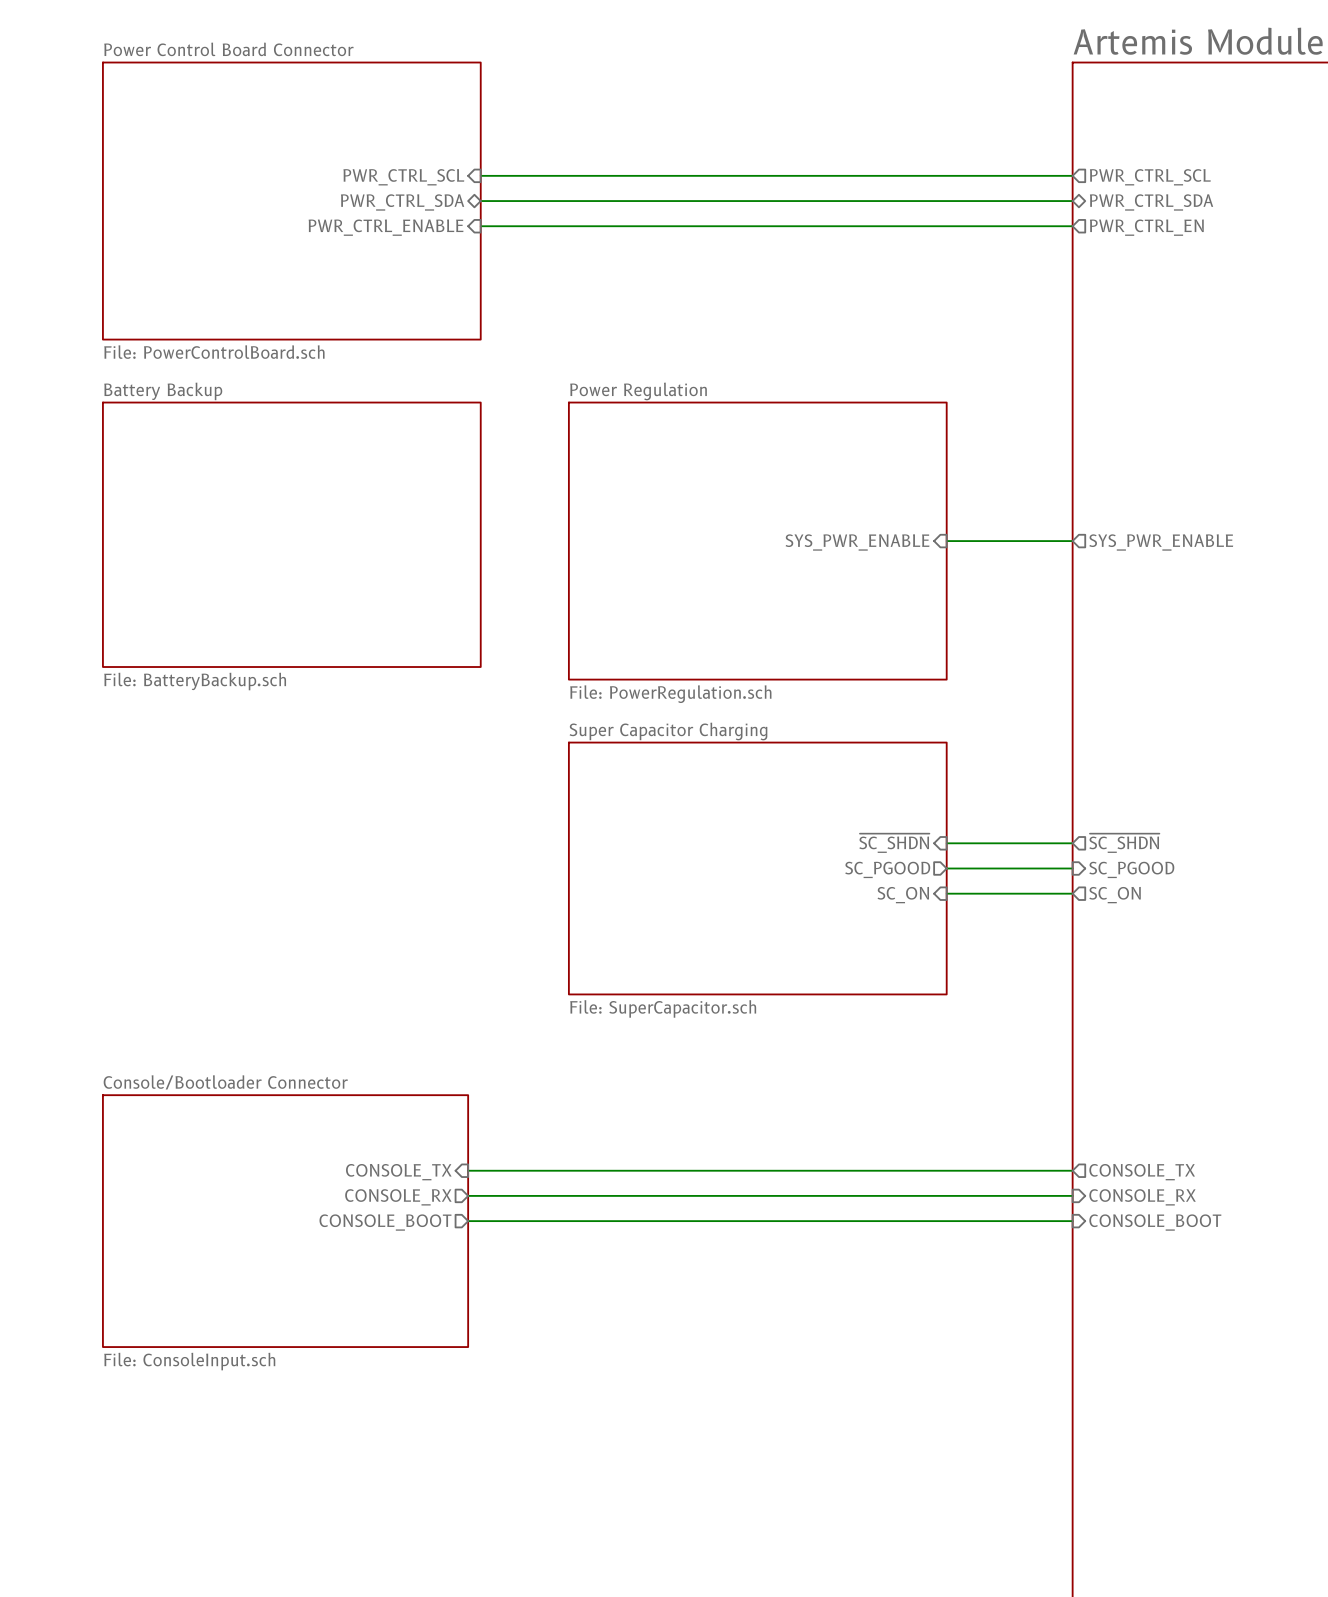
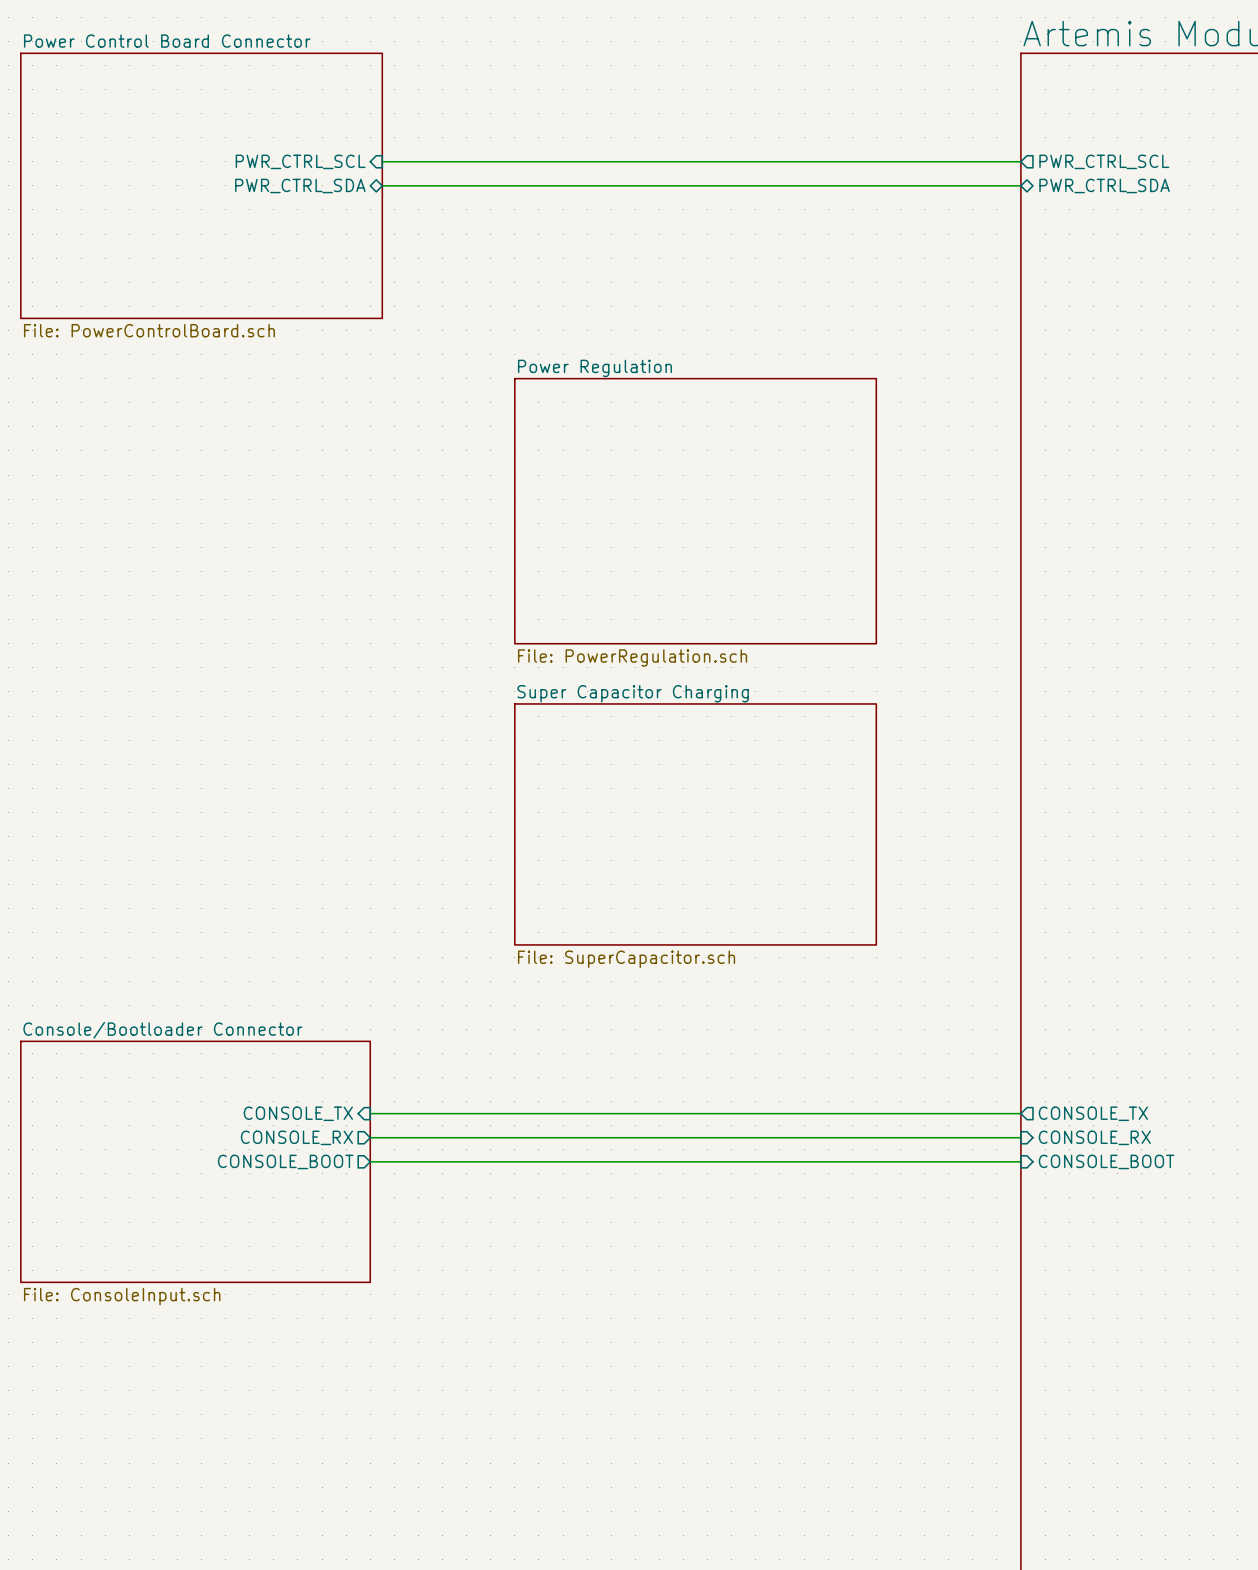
wire: none -> (382, 161) (454, 161)
sheet pin position: PWR_CTRL_SCL (403, 177) -> PWR_CTRL_SCL (300, 161)
sheet Power Control Board Connector position: (291, 201) -> (201, 185)
wire: none -> (382, 185) (454, 185)
sheet pin position: PWR_CTRL_SDA (402, 202) -> PWR_CTRL_SDA (300, 185)
wire: (480, 226) (1072, 226) -> none
sheet pin: PWR_CTRL_ENABLE (386, 227) -> none
sheet pin: PWR_CTRL_EN (1146, 227) -> none
sheet Battery Backup: File: BatteryBackup.sch (291, 534) -> none
sheet Power Regulation position: (757, 541) -> (695, 511)
wire: (946, 541) (1072, 541) -> none
sheet pin: SYS_PWR_ENABLE (857, 542) -> none
sheet pin: SYS_PWR_ENABLE (1161, 542) -> none
sheet pin: ~{SC_SHDN} (894, 843) -> none
wire: (946, 843) (1072, 843) -> none
sheet pin: ~{SC_SHDN} (1124, 843) -> none
sheet Super Capacitor Charging position: (757, 868) -> (695, 824)
wire: (946, 868) (1072, 868) -> none
sheet pin: SC_PGOOD (887, 869) -> none
sheet pin: SC_PGOOD (1131, 869) -> none
wire: (946, 893) (1072, 893) -> none
sheet pin: SC_ON (903, 895) -> none
sheet pin: SC_ON (1115, 895) -> none
wire: none -> (370, 1113) (442, 1113)
sheet pin position: CONSOLE_TX (398, 1172) -> CONSOLE_TX (298, 1113)
wire: none -> (370, 1137) (442, 1137)
sheet pin position: CONSOLE_RX (398, 1197) -> CONSOLE_RX (296, 1137)
sheet Console/Bootloader Connector position: (285, 1221) -> (195, 1161)
wire: none -> (370, 1161) (442, 1161)
sheet pin position: CONSOLE_BOOT (385, 1222) -> CONSOLE_BOOT (285, 1161)

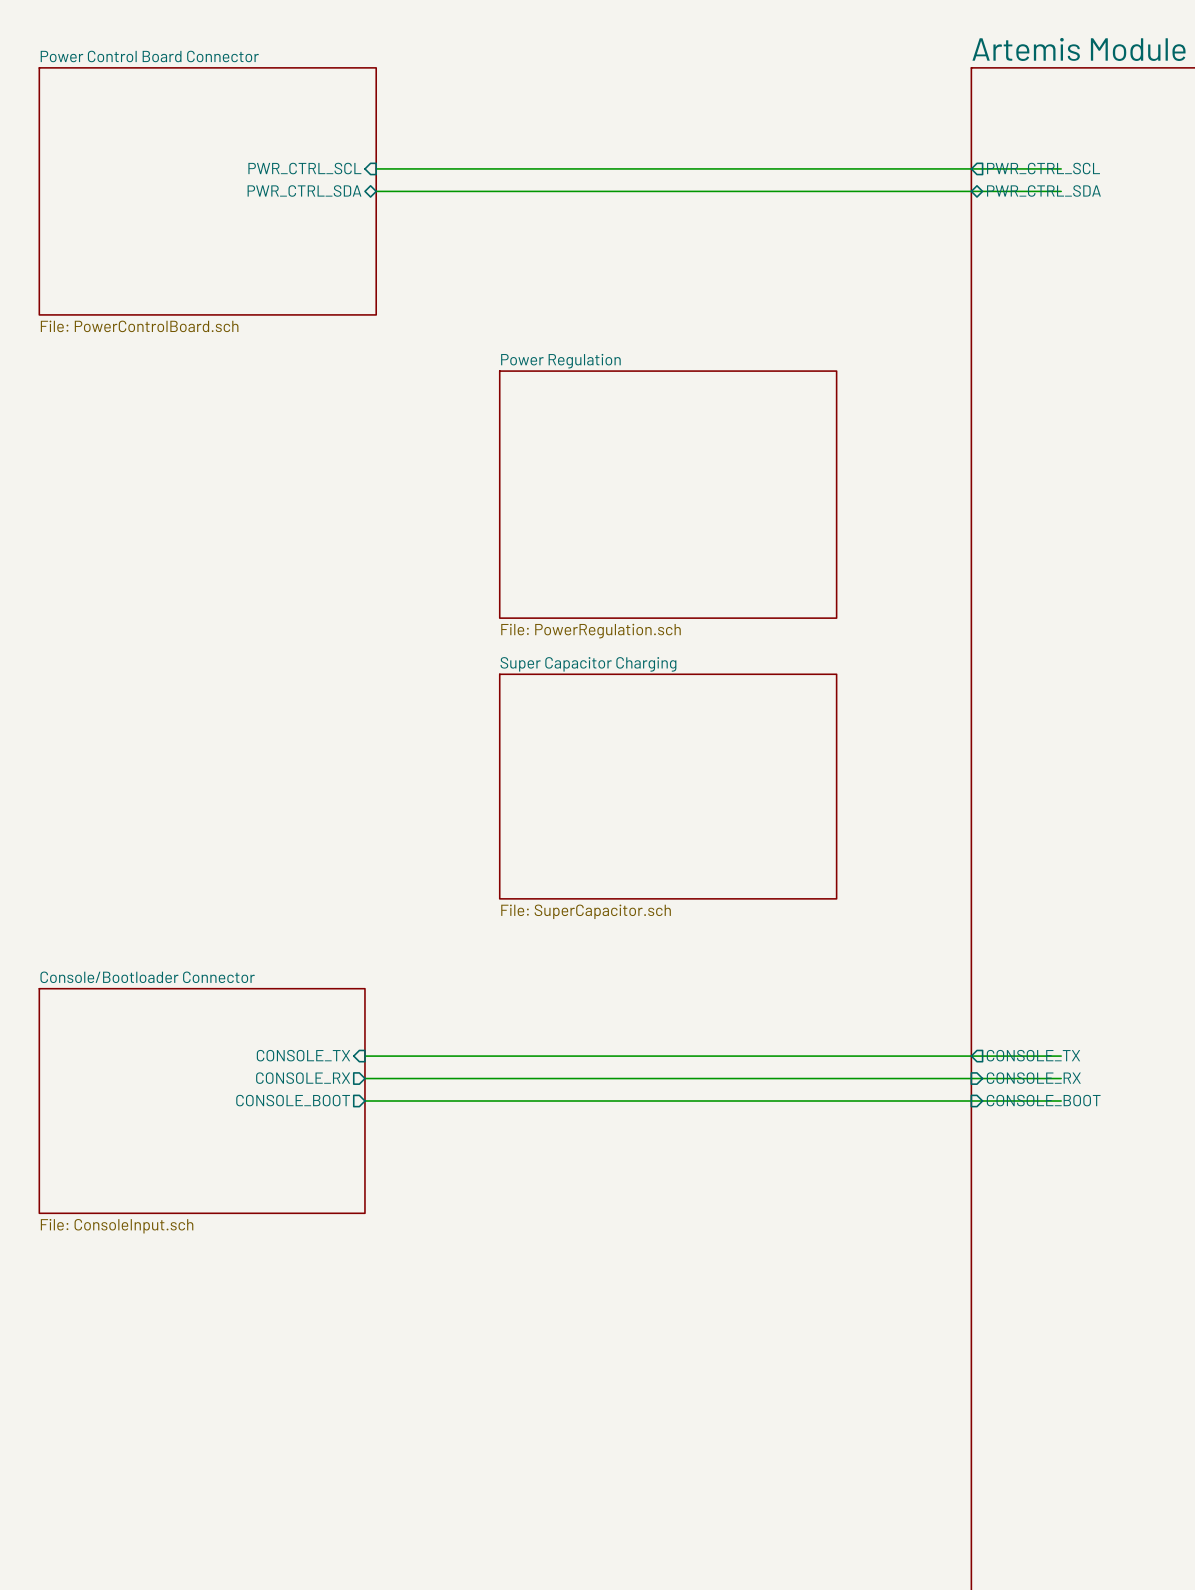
wire: none -> (971, 168) (1061, 168)
wire: none -> (971, 191) (1061, 191)
wire: none -> (971, 1056) (1061, 1056)
wire: none -> (971, 1078) (1061, 1078)
wire: none -> (971, 1101) (1061, 1101)

